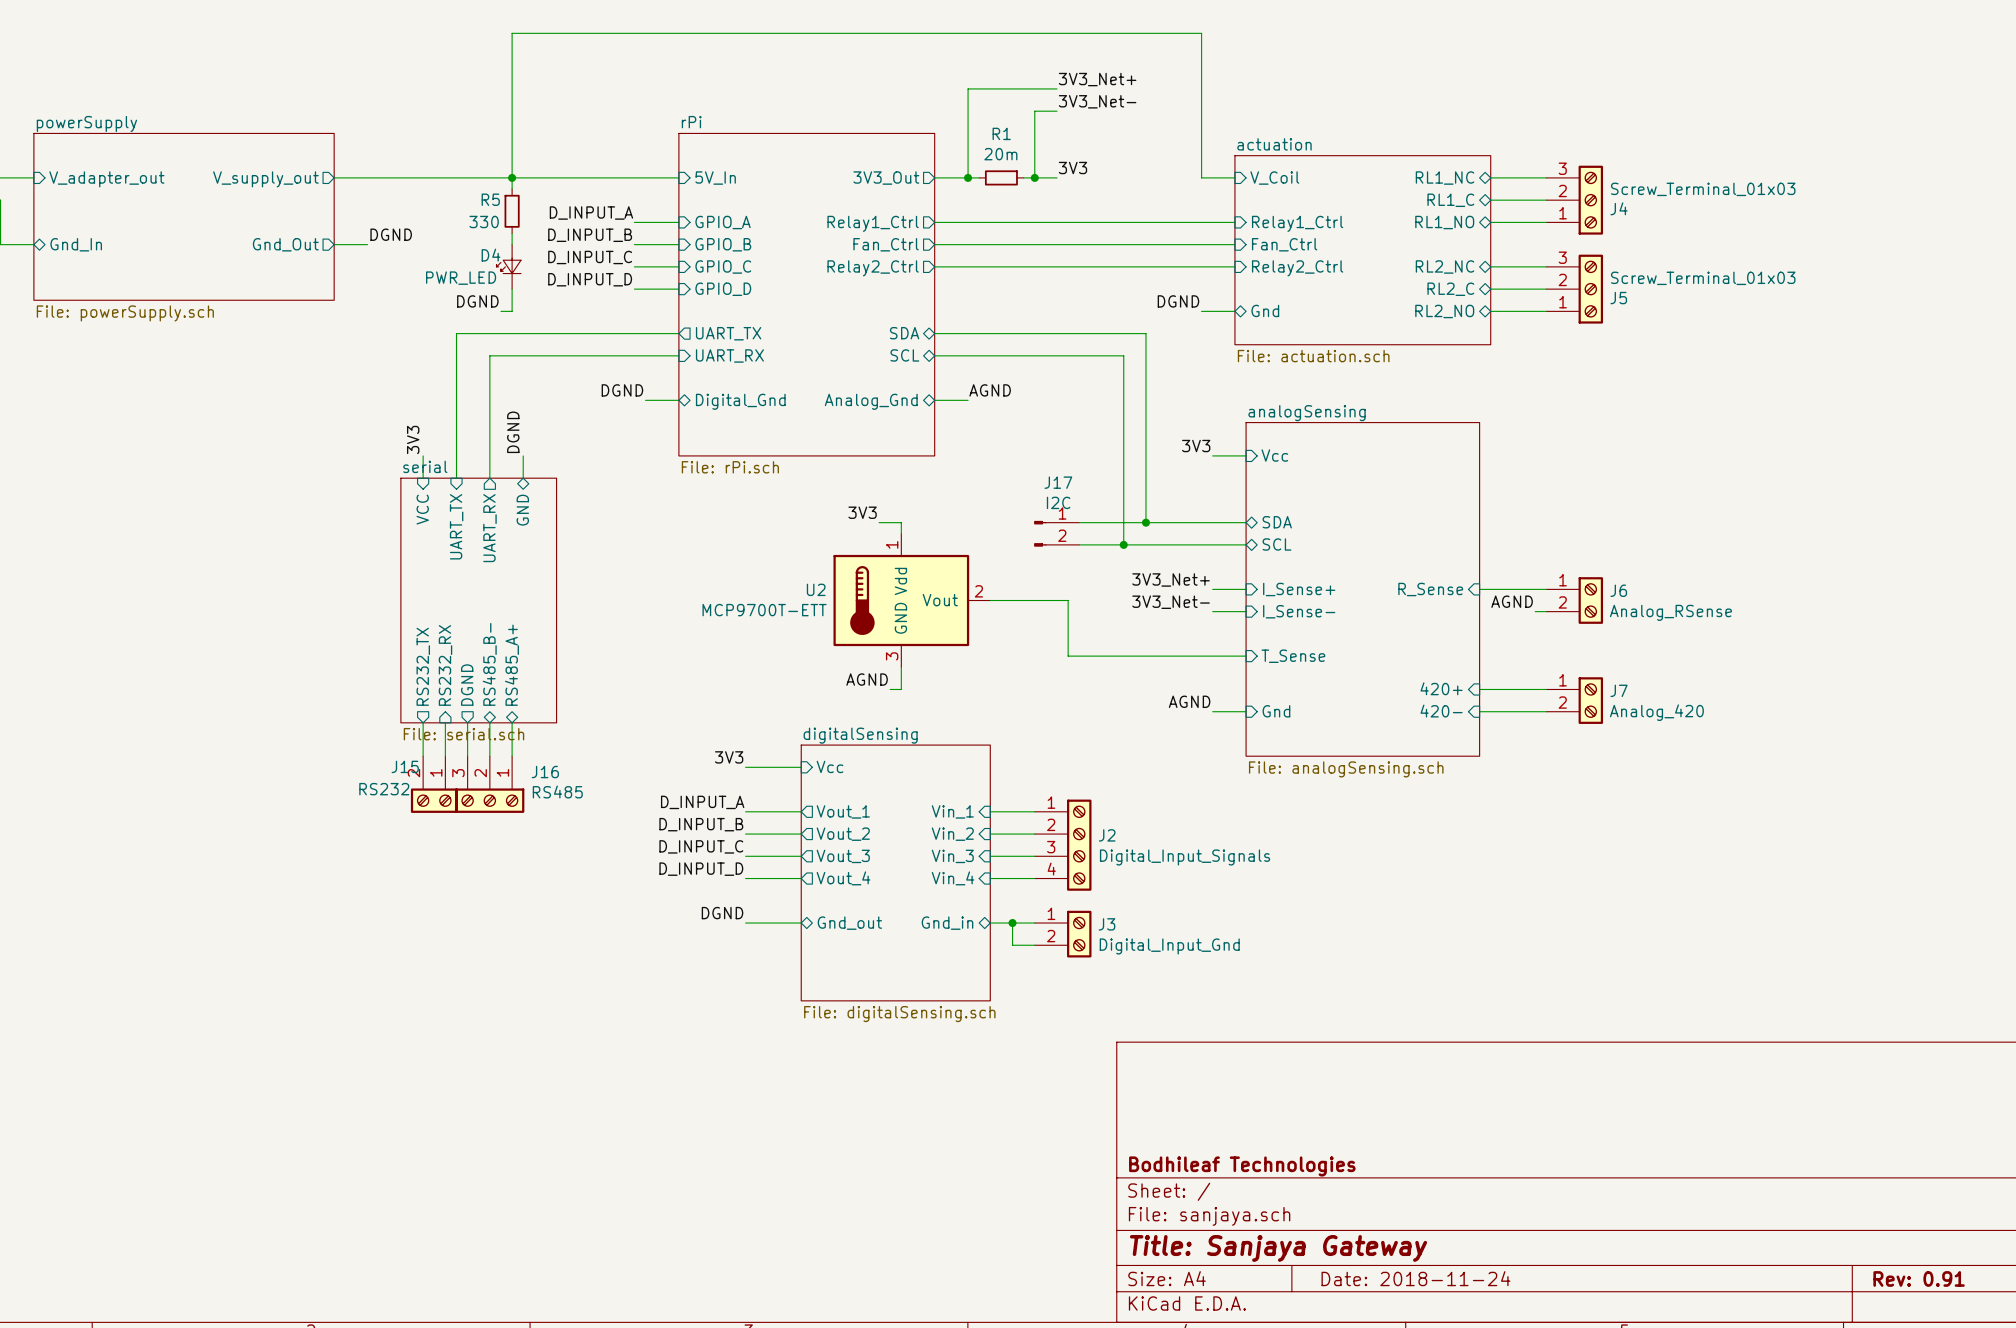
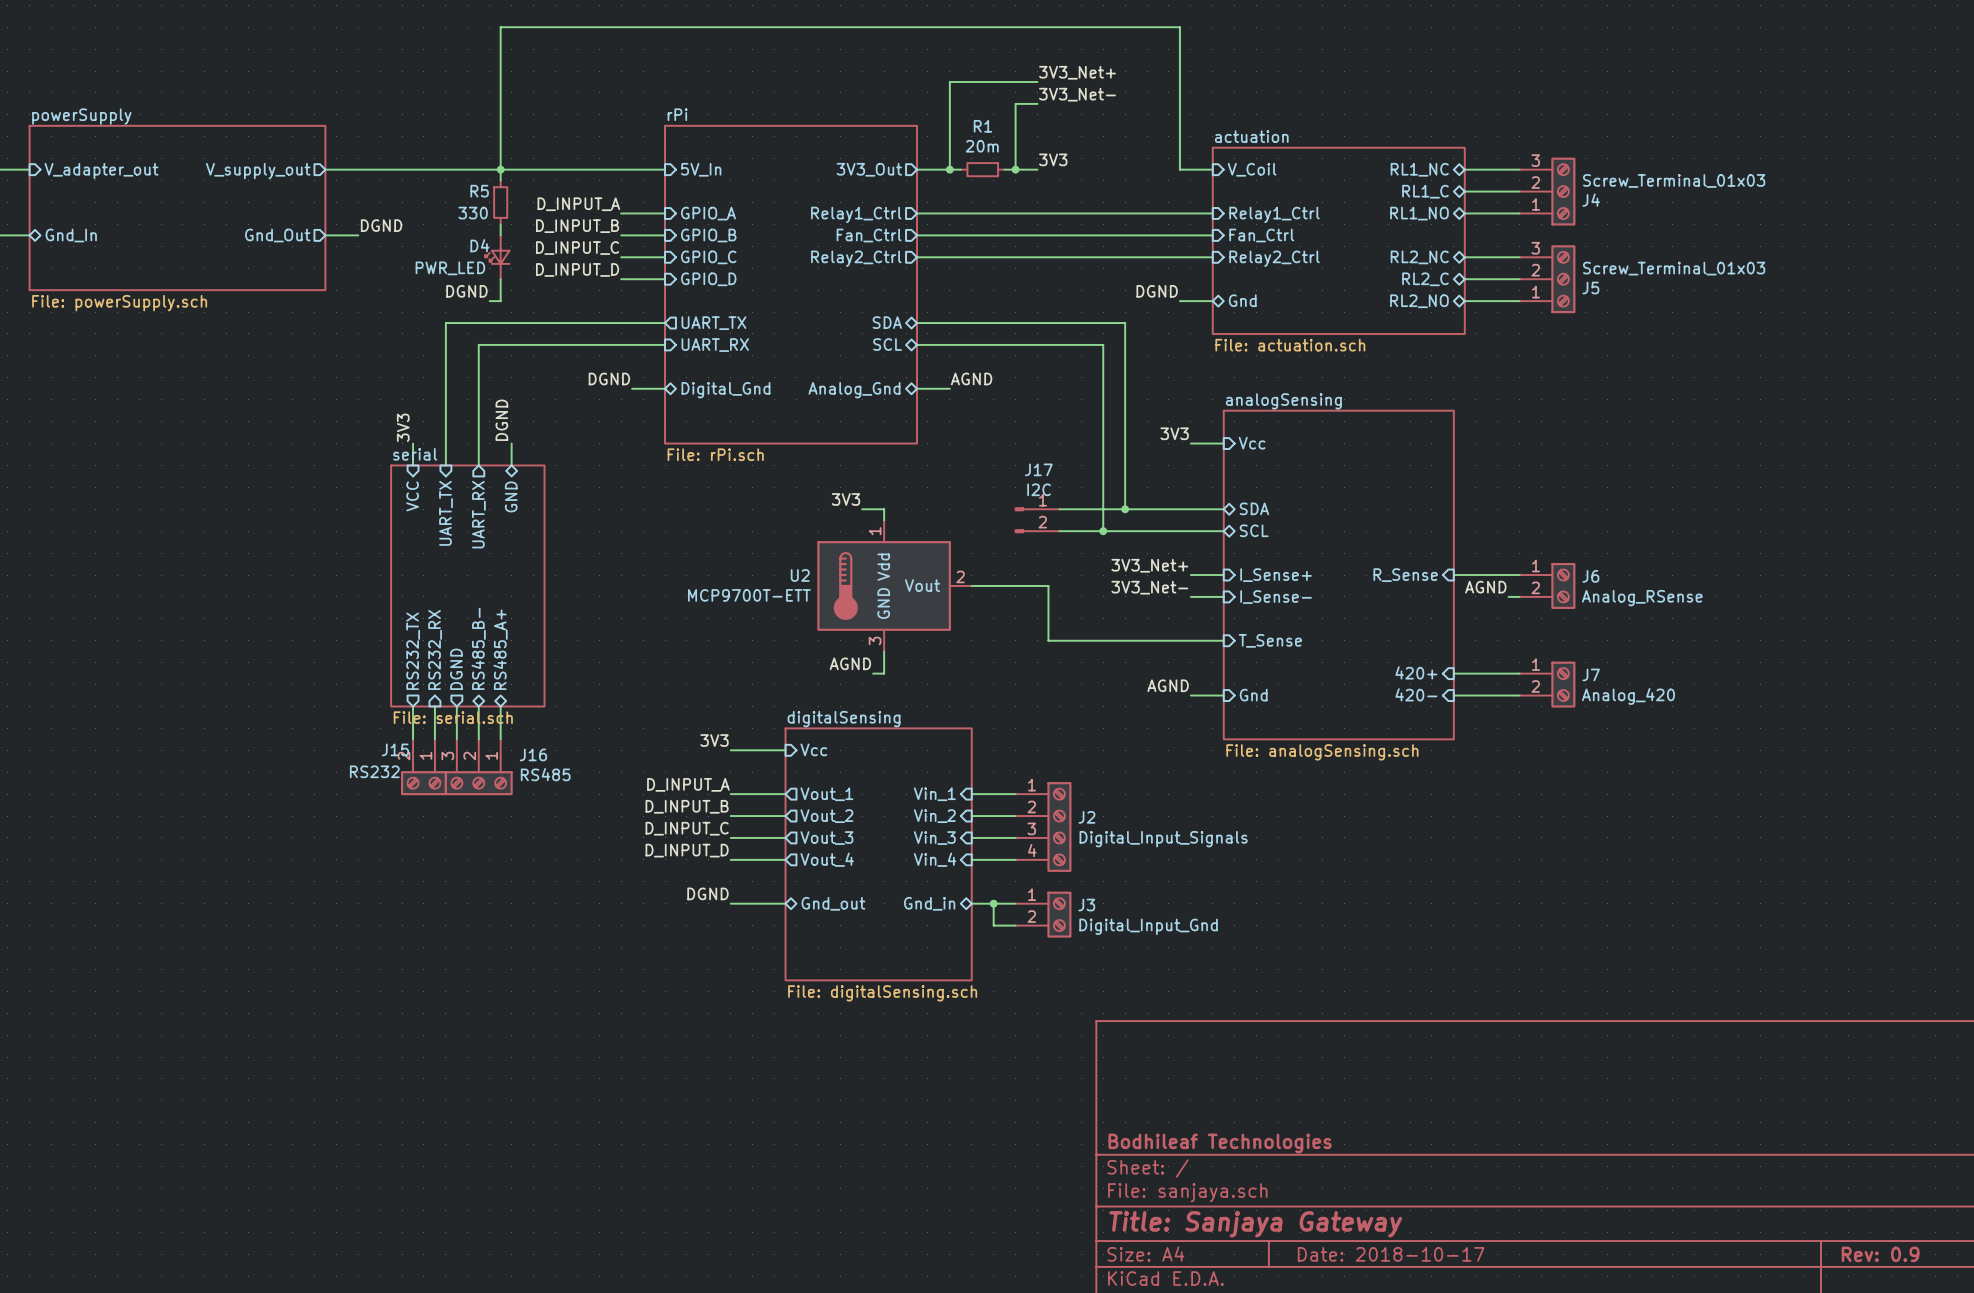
title block: Date: 2018-11-24 (1415, 1278) -> Date: 2018-10-17 (1391, 1254)
title block: Rev: 0.91 (1919, 1278) -> Rev: 0.9 (1880, 1254)

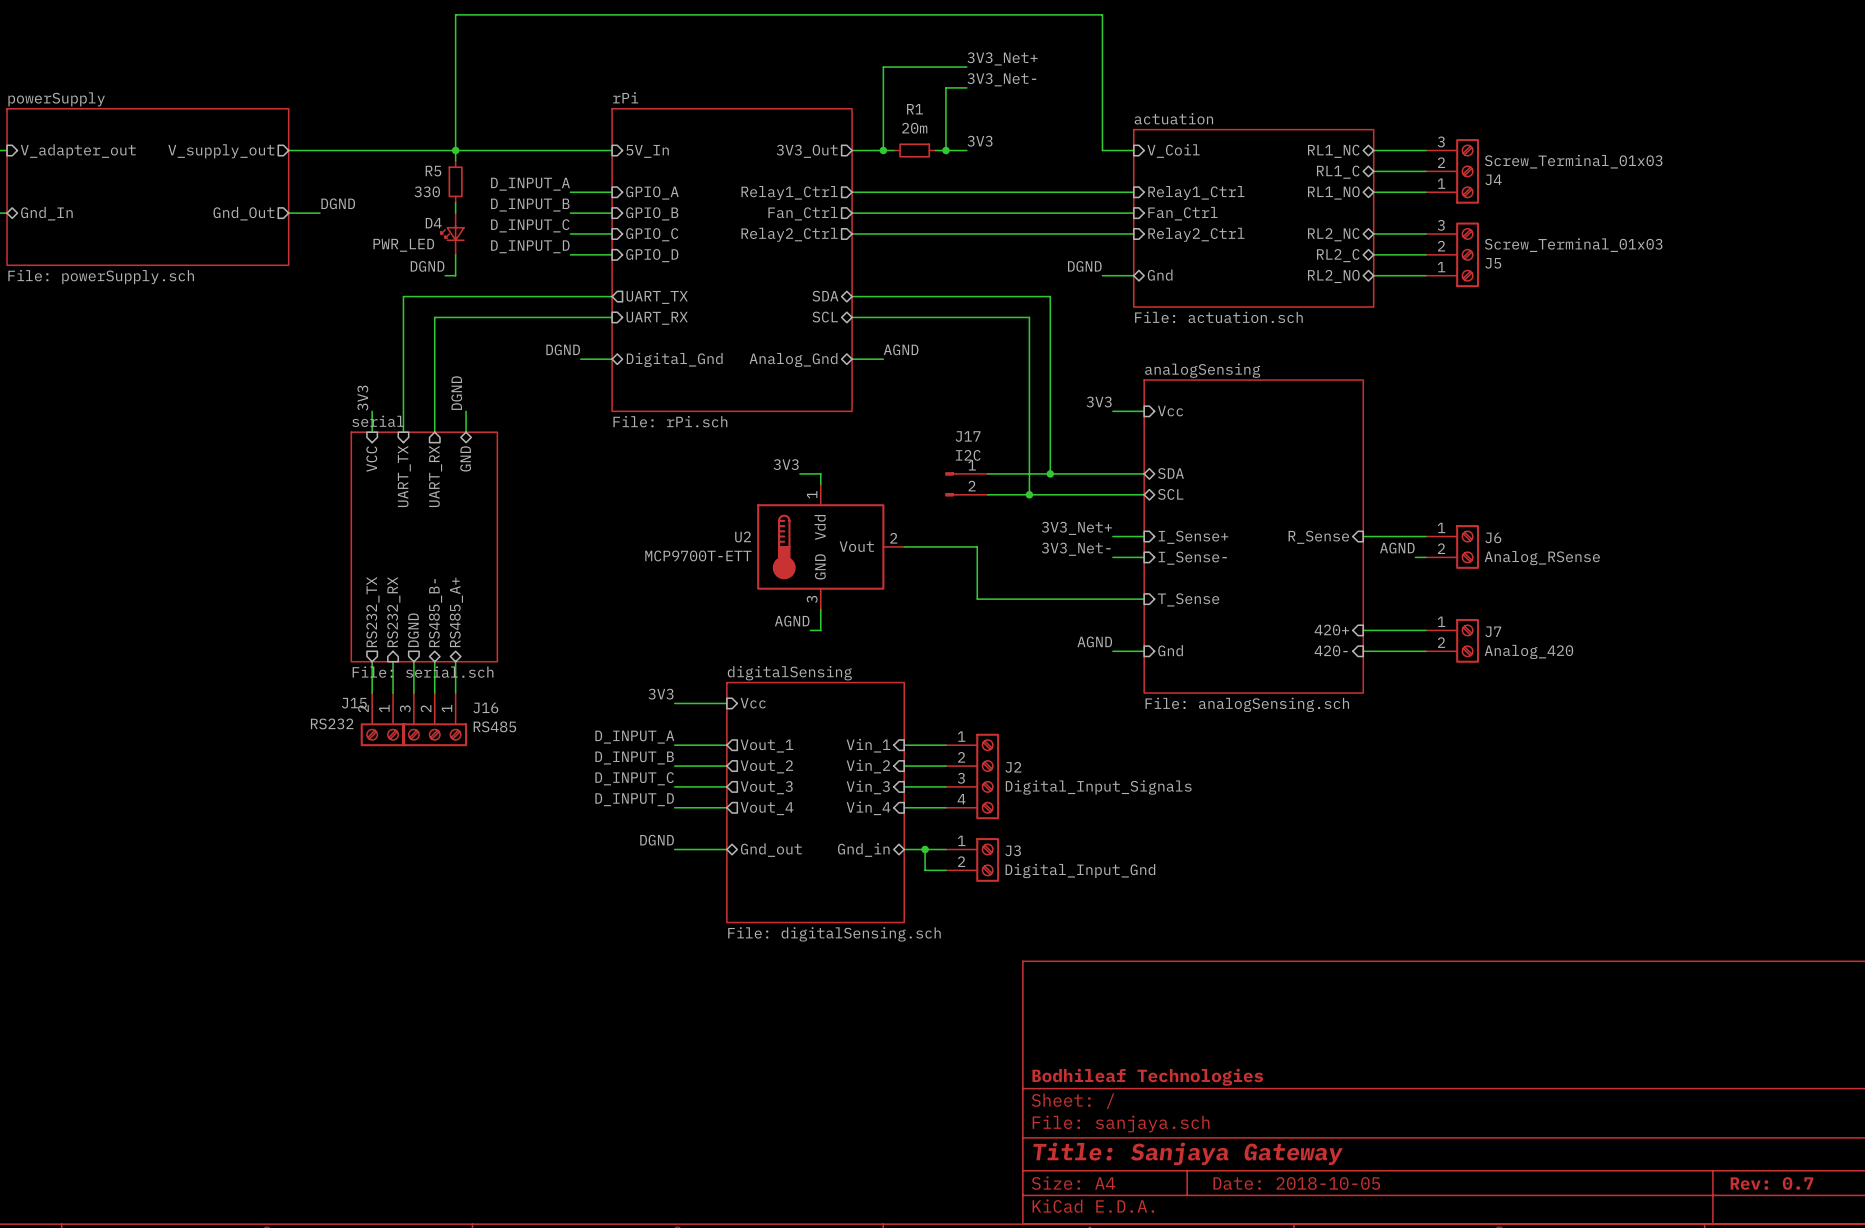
title block: Date: 2018-10-17 (1391, 1254) -> Date: 2018-10-05 (1296, 1183)
title block: Rev: 0.9 (1880, 1254) -> Rev: 0.7 (1771, 1183)

